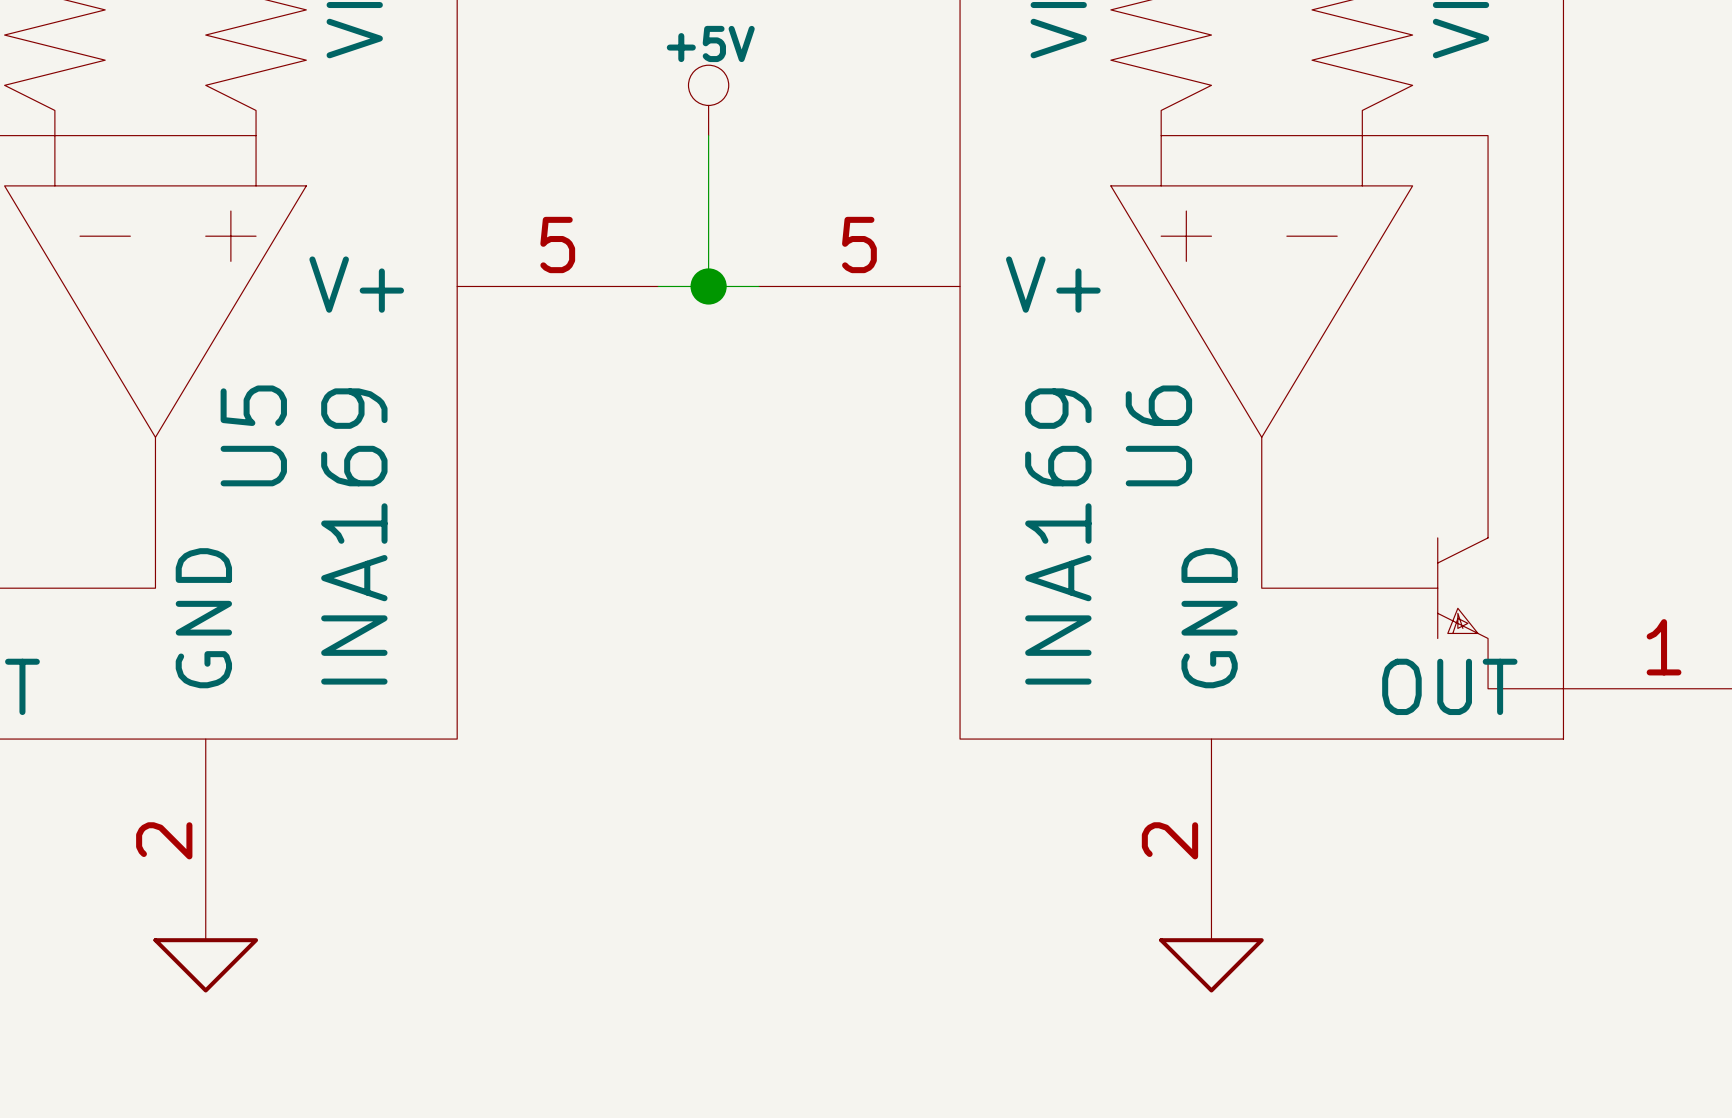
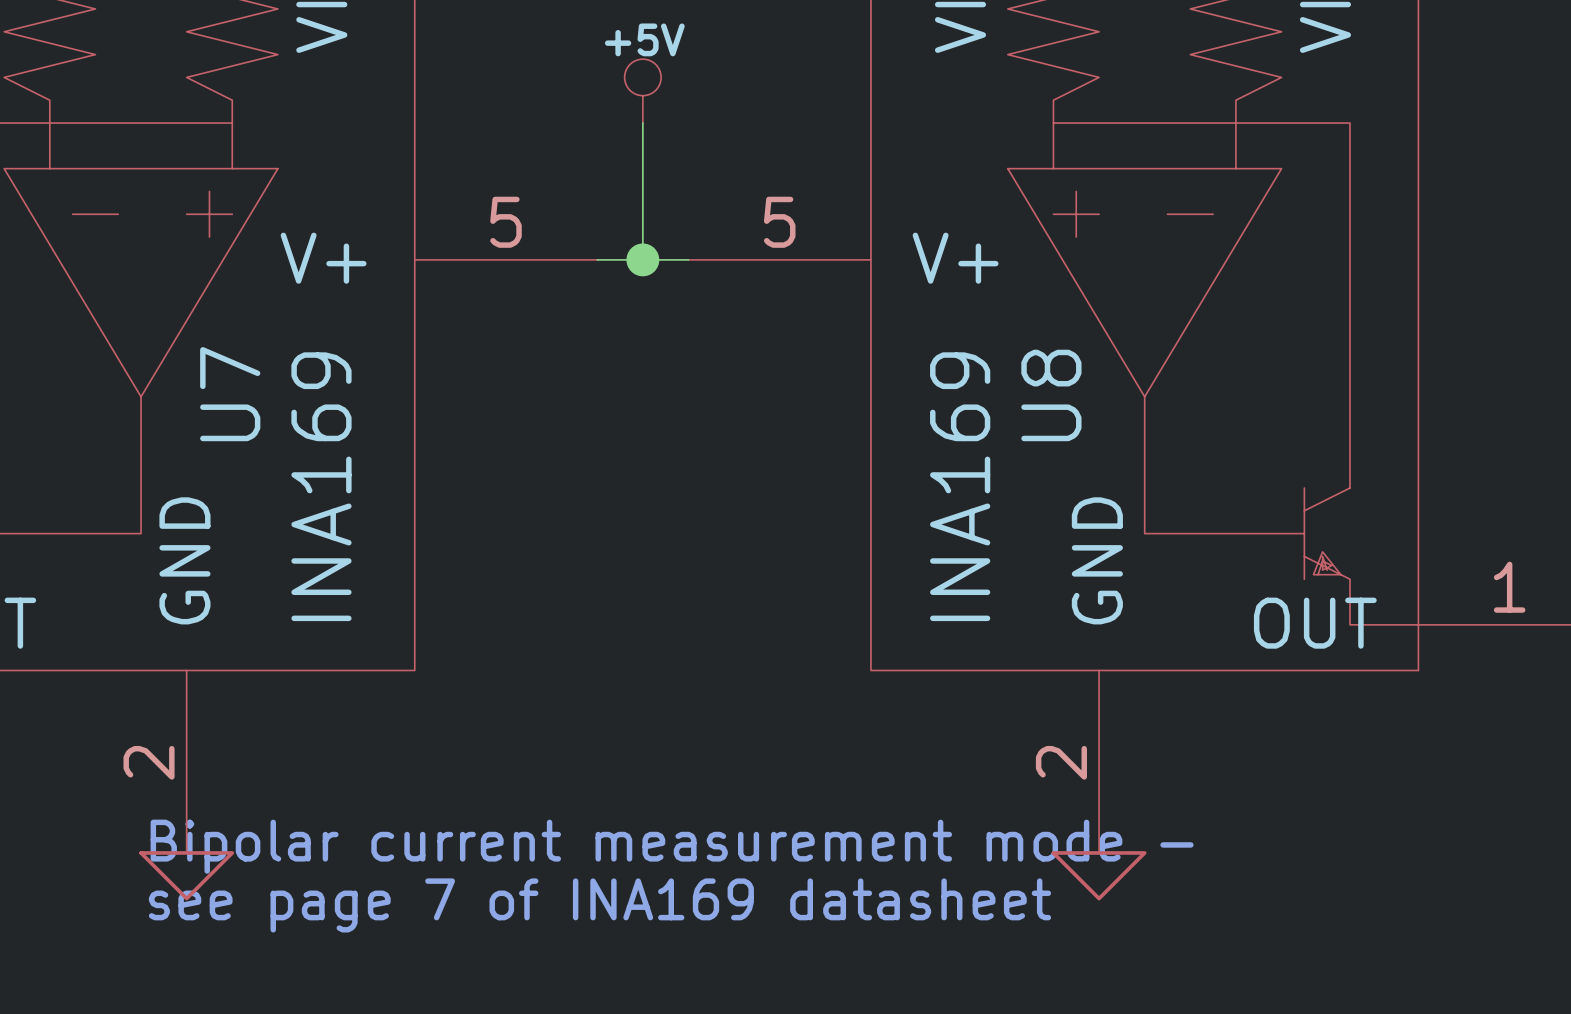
U5 name: U5 (253, 435) -> U7 (230, 394)
U6 name: U6 (1158, 435) -> U8 (1051, 395)
text: none -> Bipolar current measurement mode - (672, 846)
text: none -> see page 7 of INA169 datasheet (599, 905)

